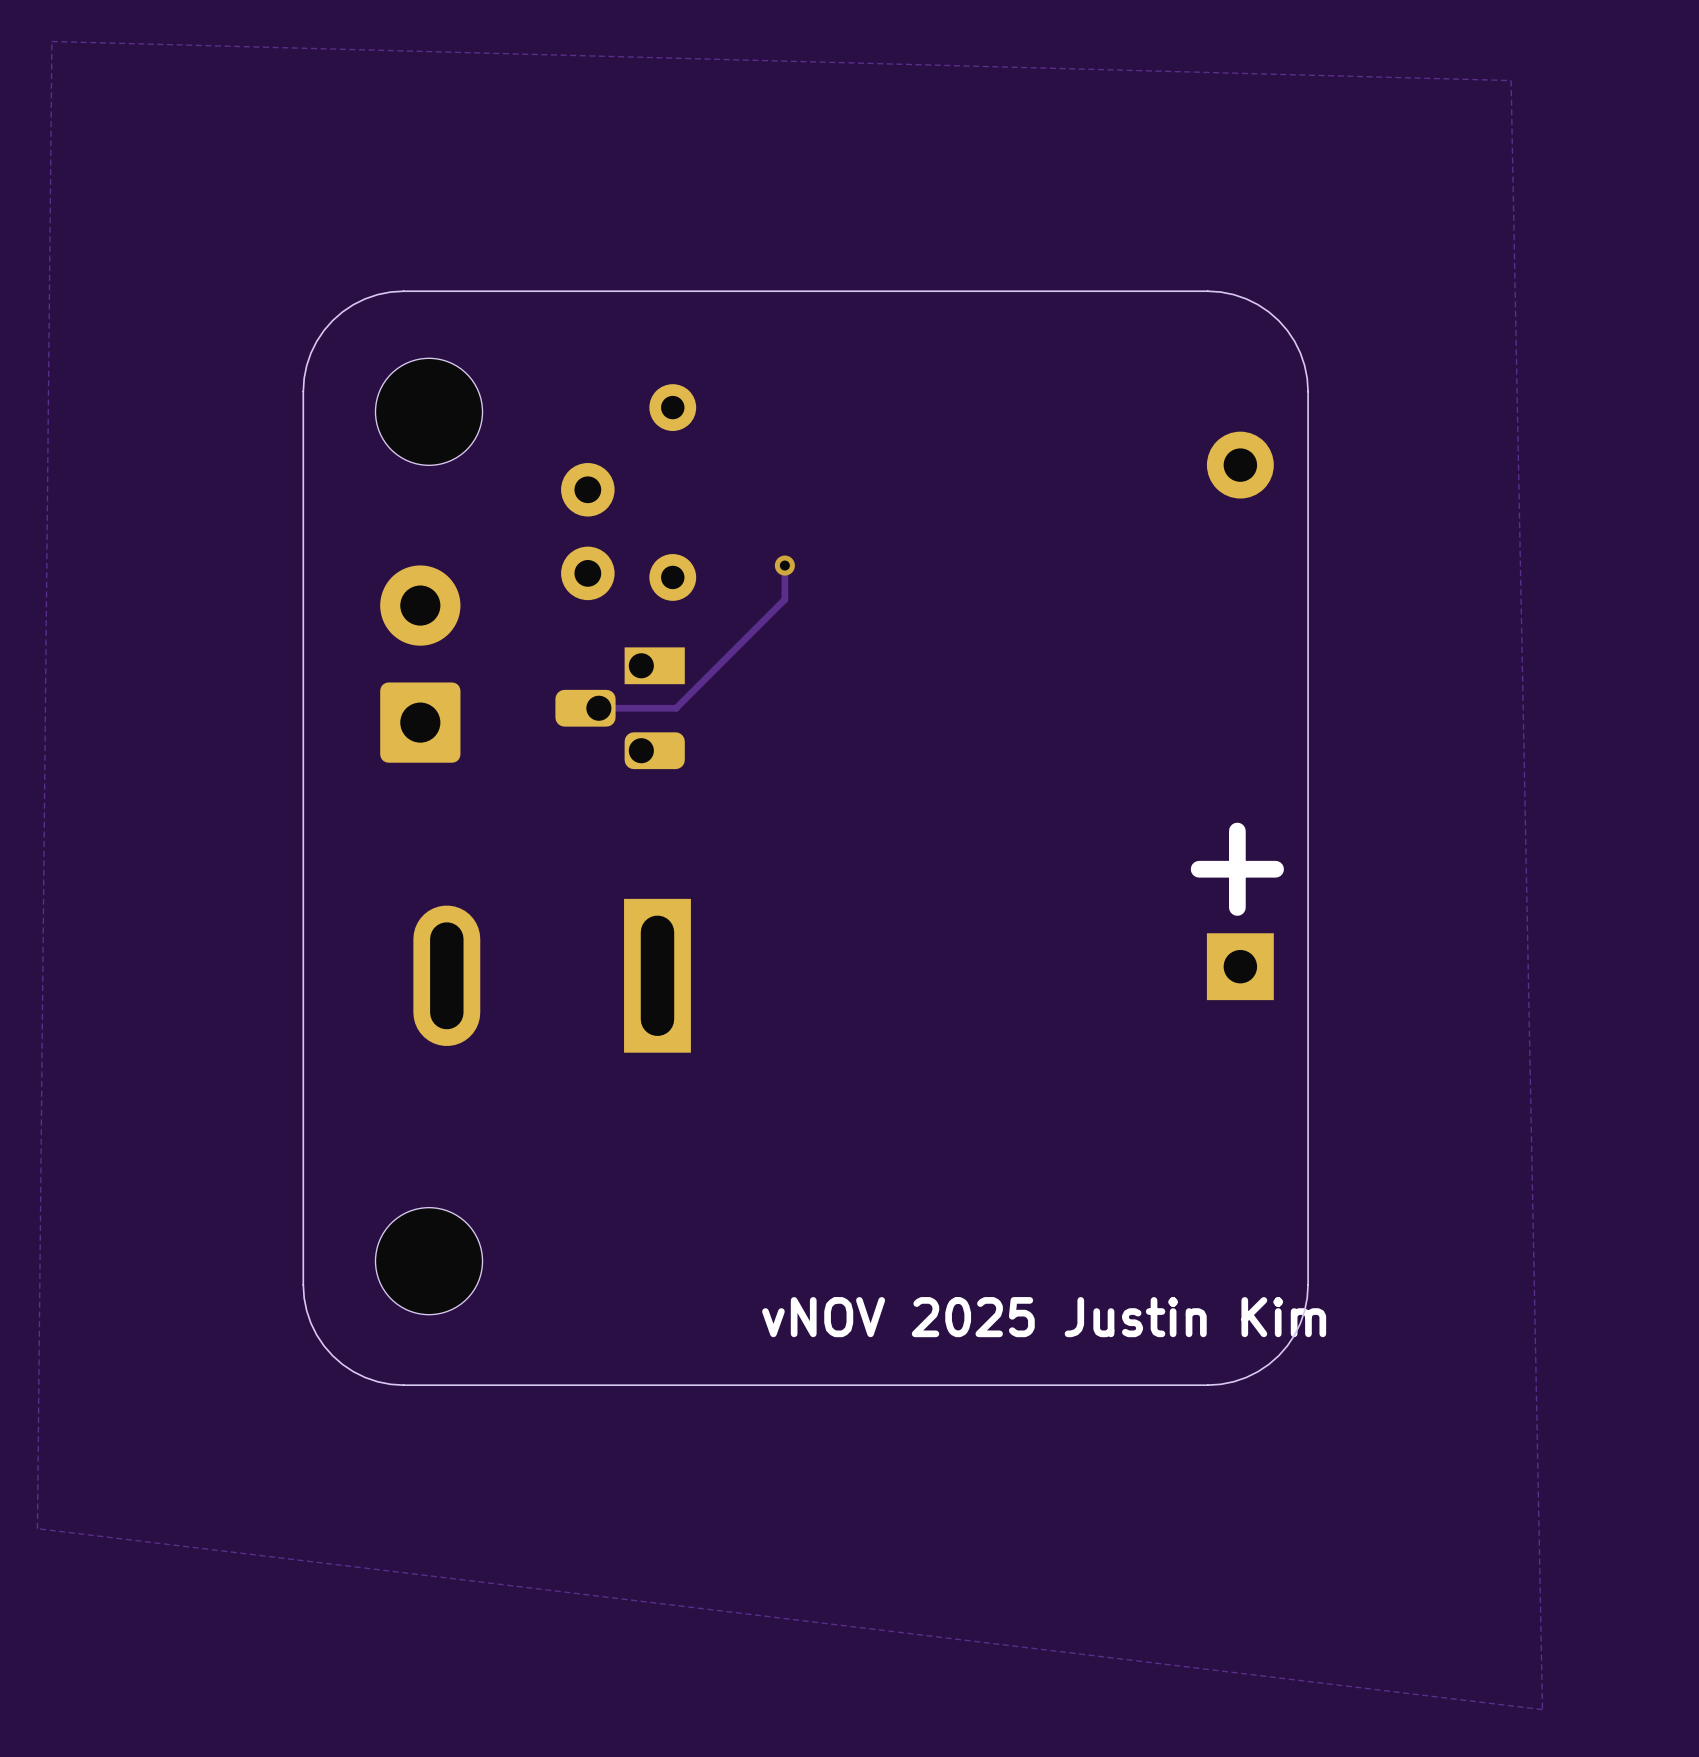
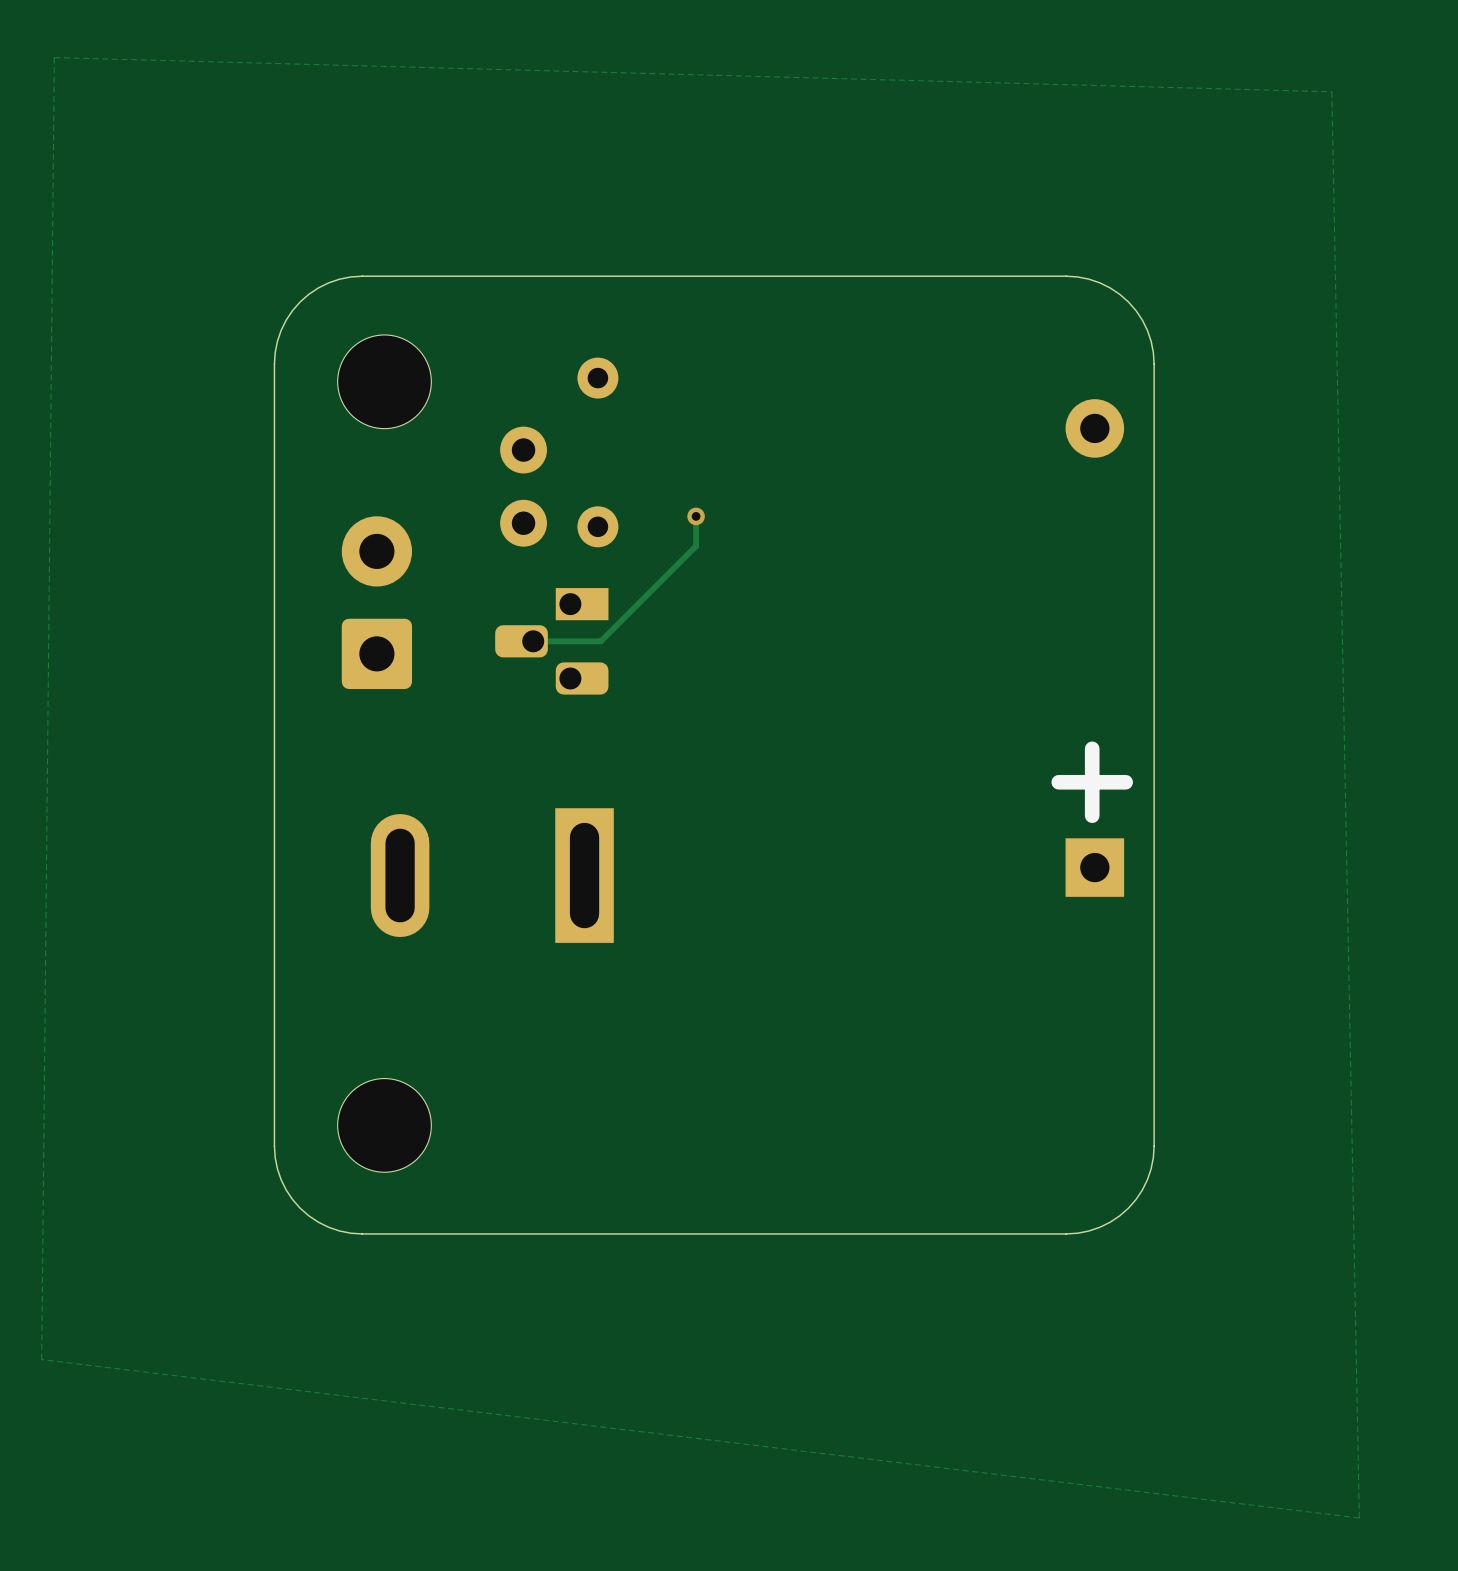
text: vNOV 2025 Justin Kim (1044, 1317) -> none

